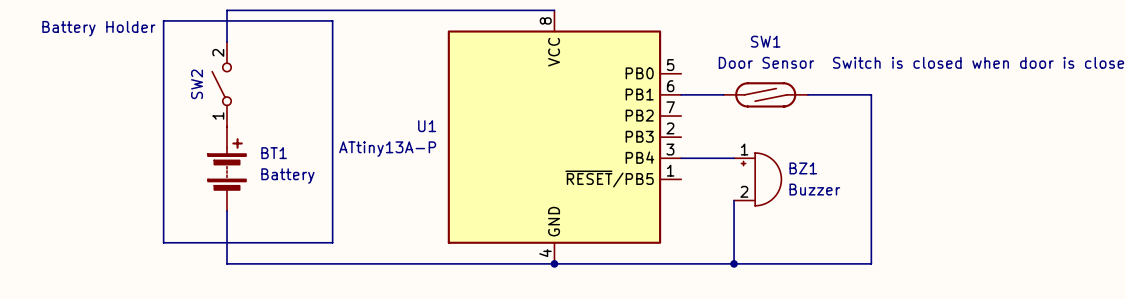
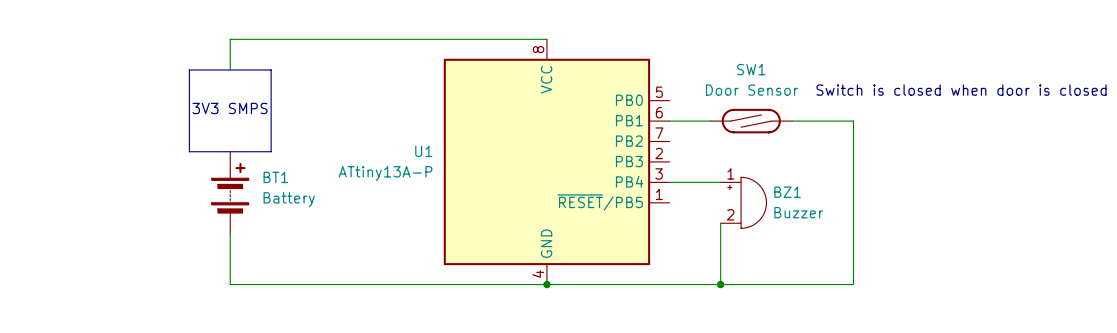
line: (163, 20) (332, 20) (332, 242) (163, 242) (163, 20) -> none
text: Battery Holder (98, 28) -> none
line: none -> (189, 70) (271, 70) (271, 151) (189, 151) (189, 70)
text: none -> 3V3 SMPS (230, 108)
SW2: (221, 84) -> none

